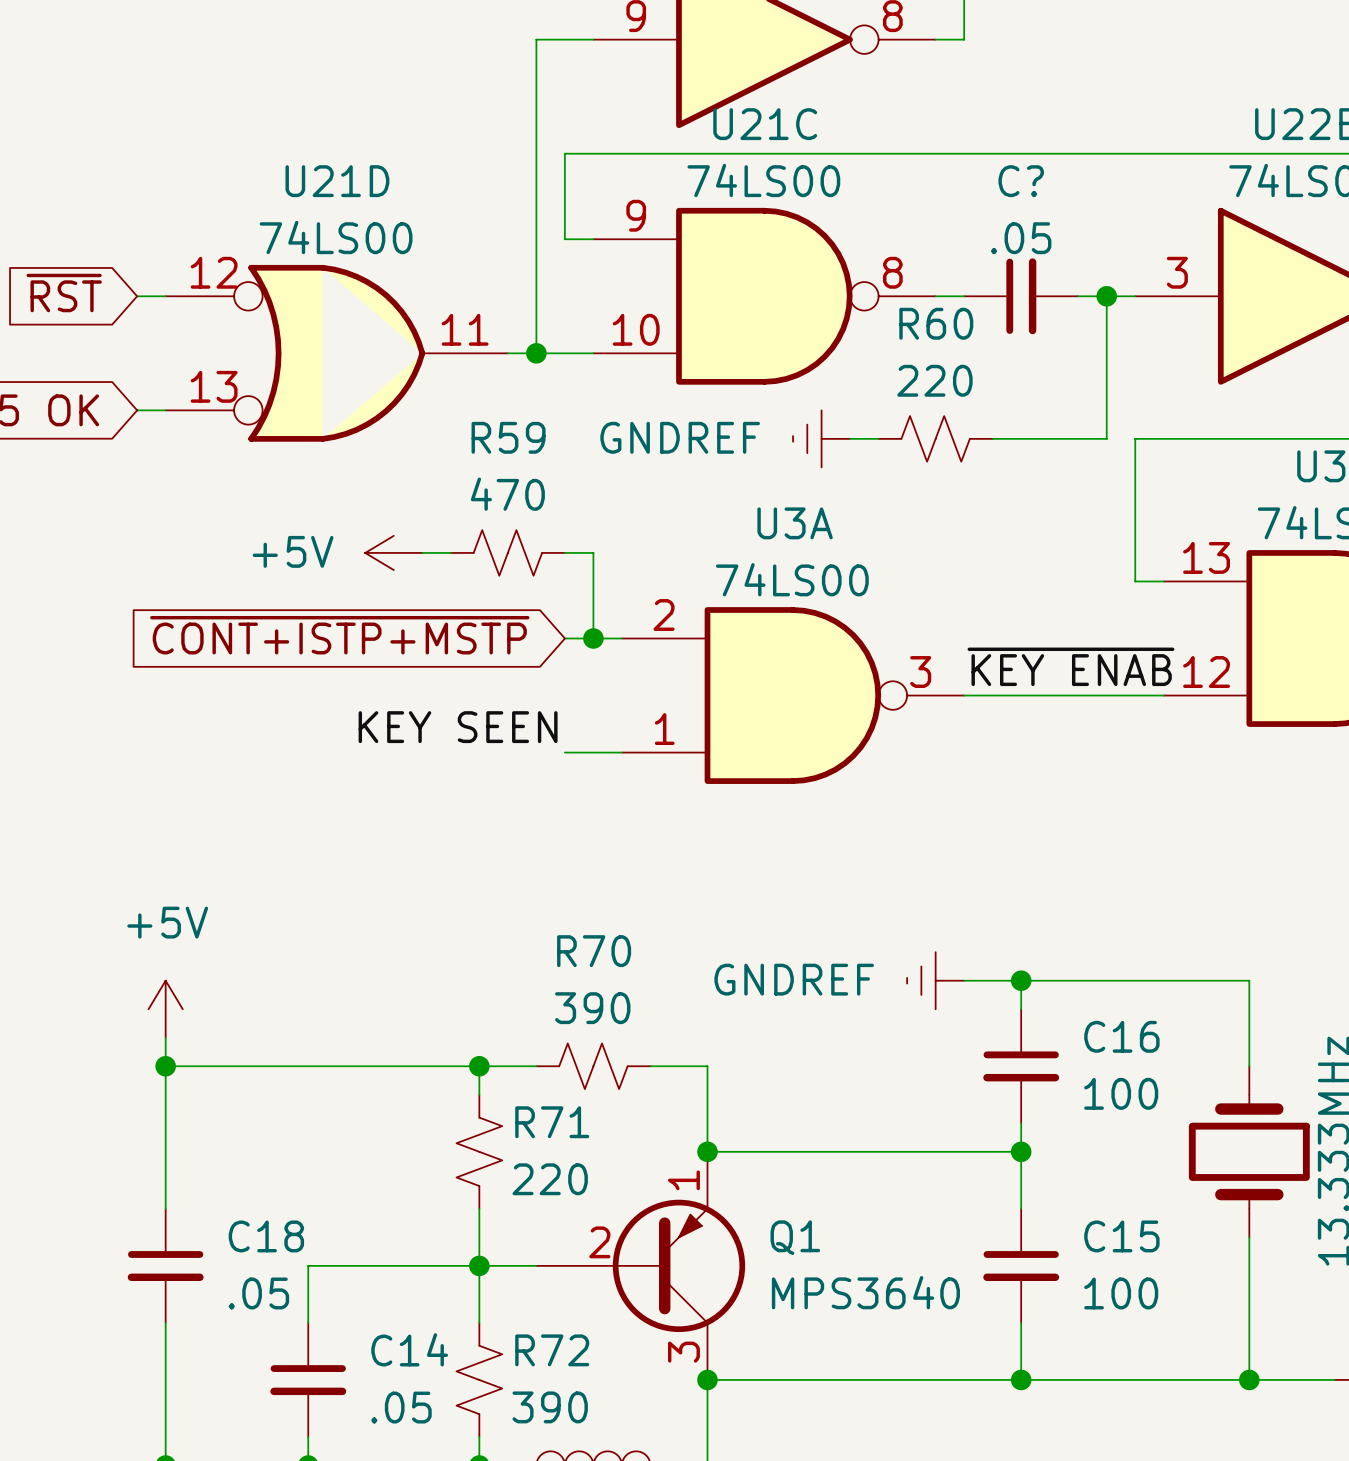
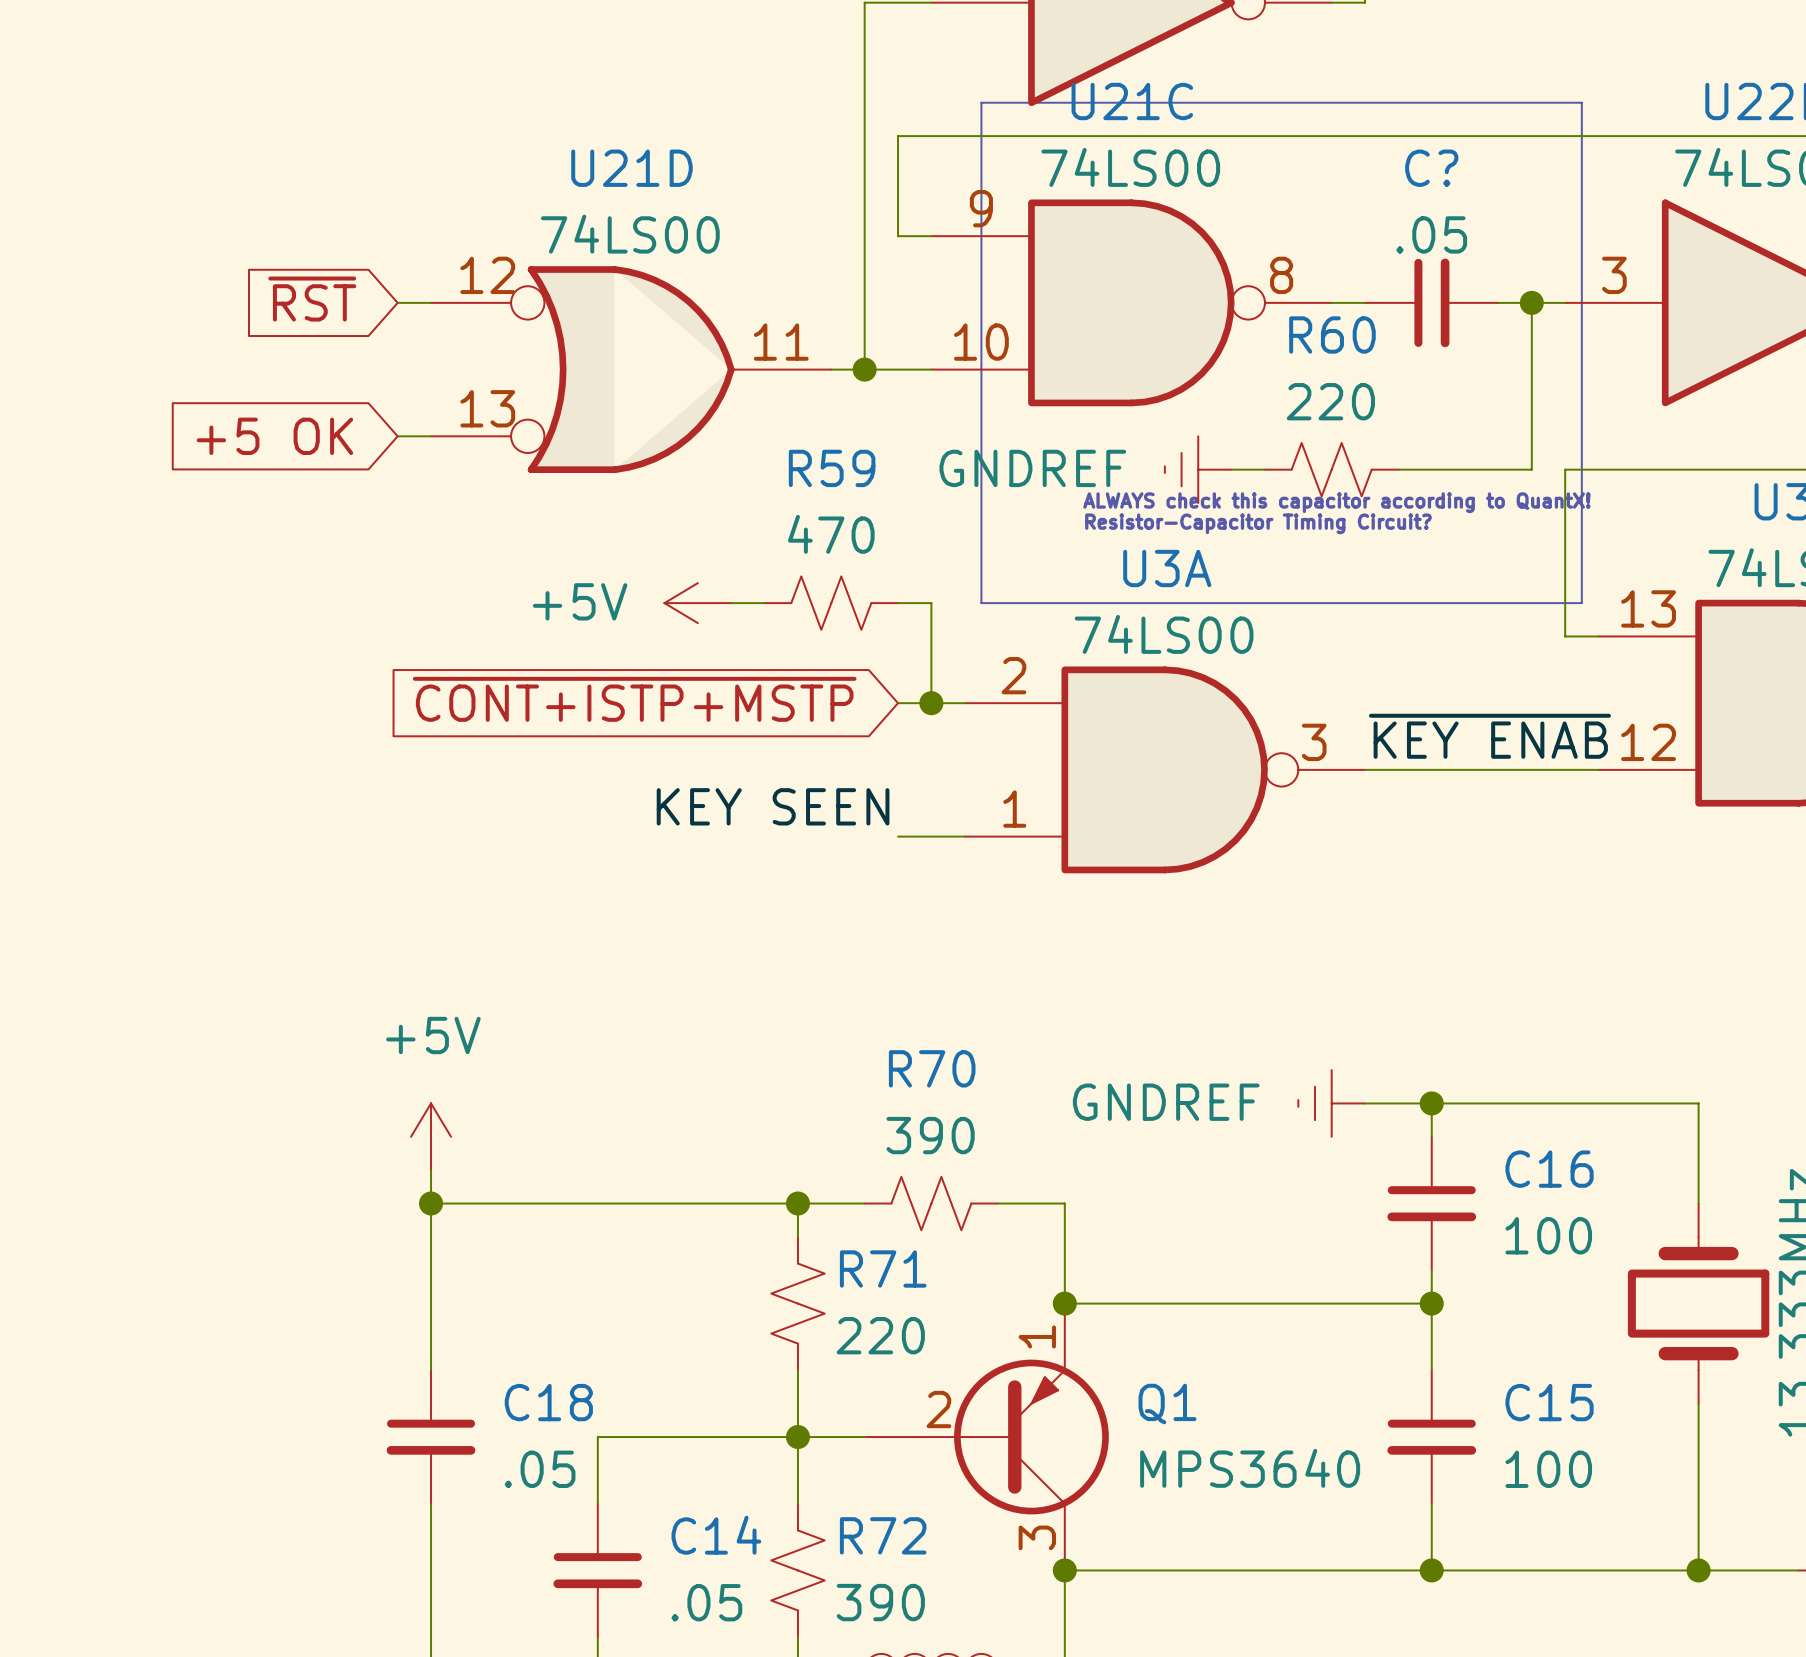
line: none -> (981, 102) (1581, 102) (1581, 603) (981, 603) (981, 102)
text: none -> ALWAYS check this capacitor according to QuantX! (1336, 502)
text: none -> Resistor-Capacitor Timing Circuit? (1258, 523)

